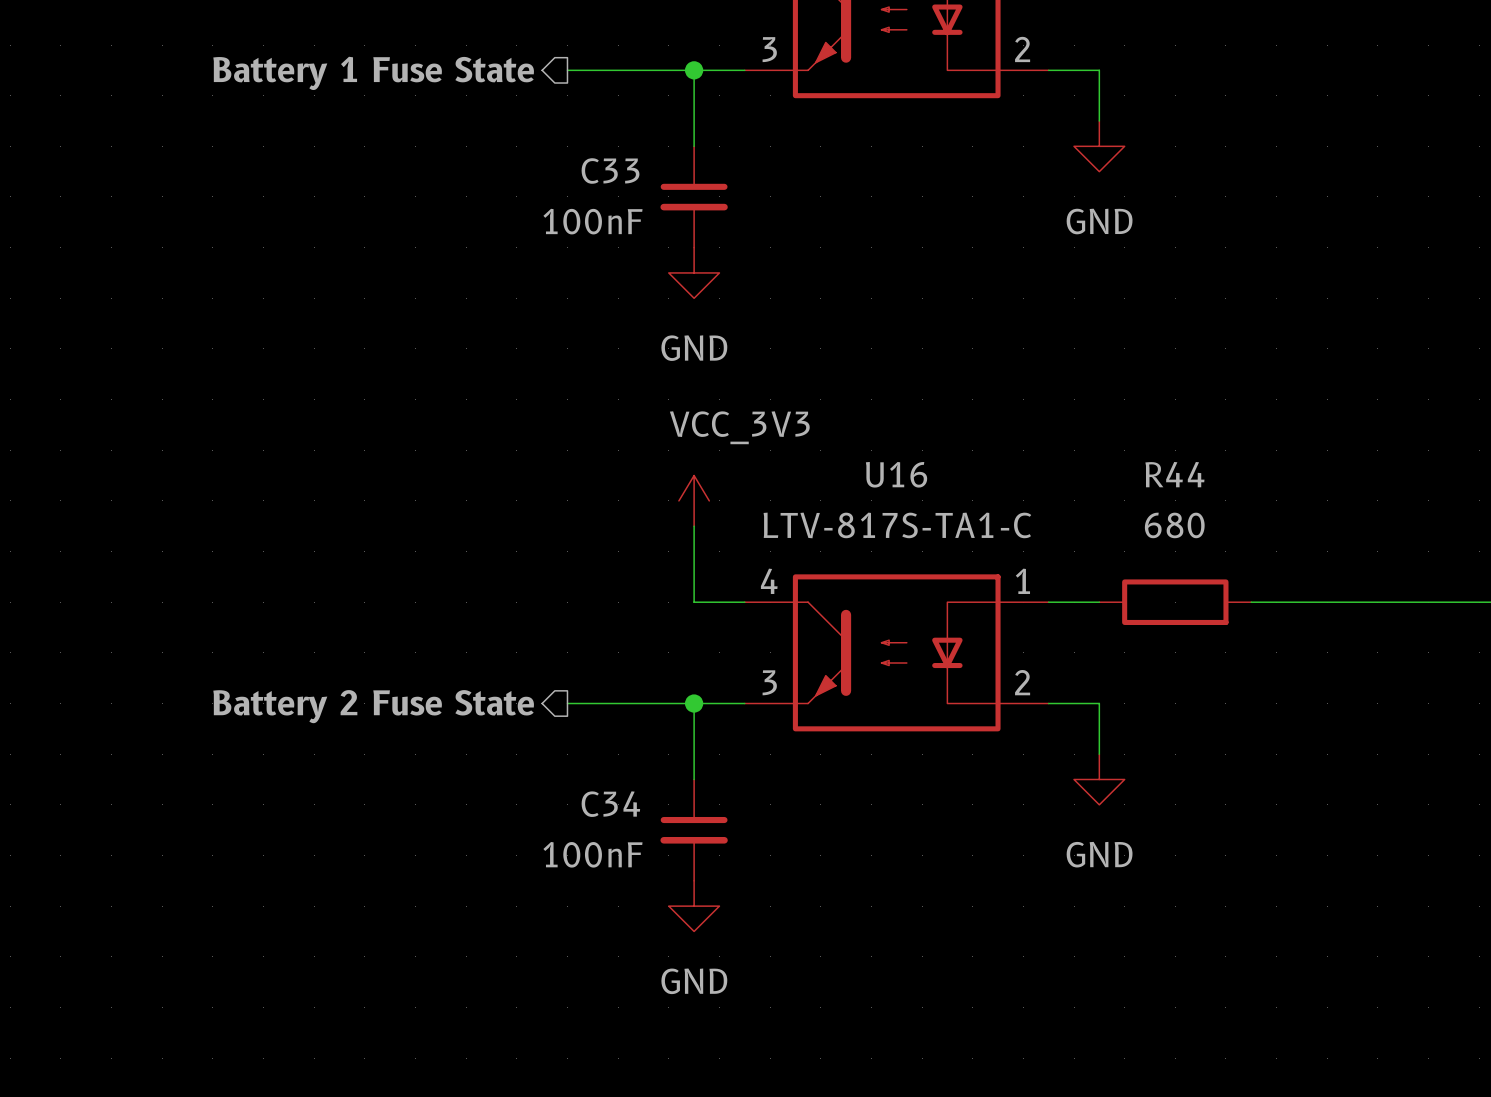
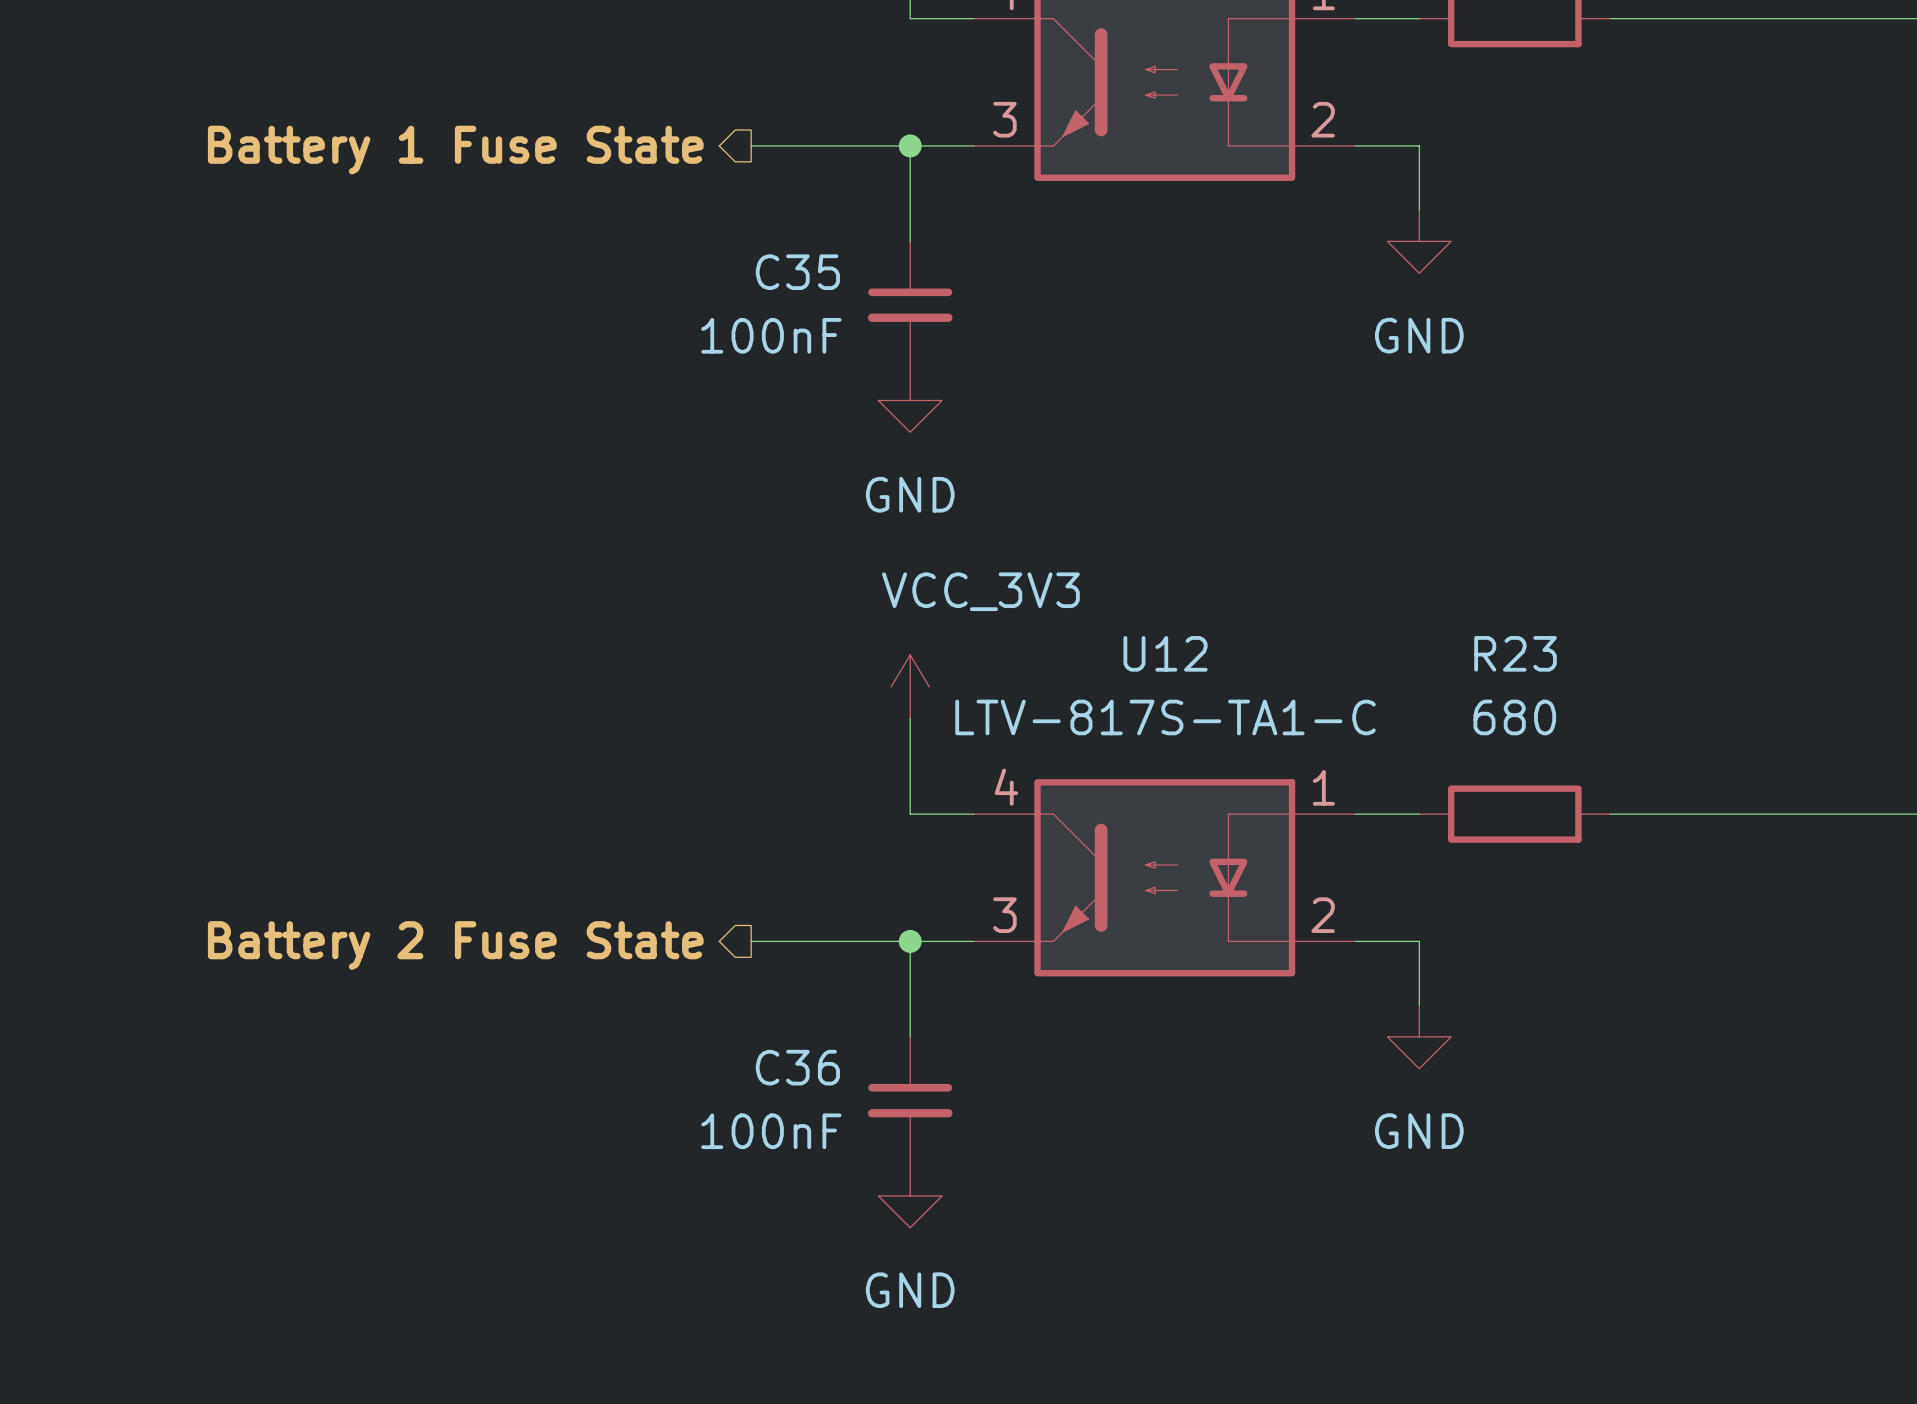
C33 name: C33 (610, 170) -> C35 (797, 272)
U16 name: U16 (896, 474) -> U12 (1165, 653)
R44 name: R44 (1174, 474) -> R23 (1515, 653)
C34 name: C34 (610, 804) -> C36 (797, 1067)

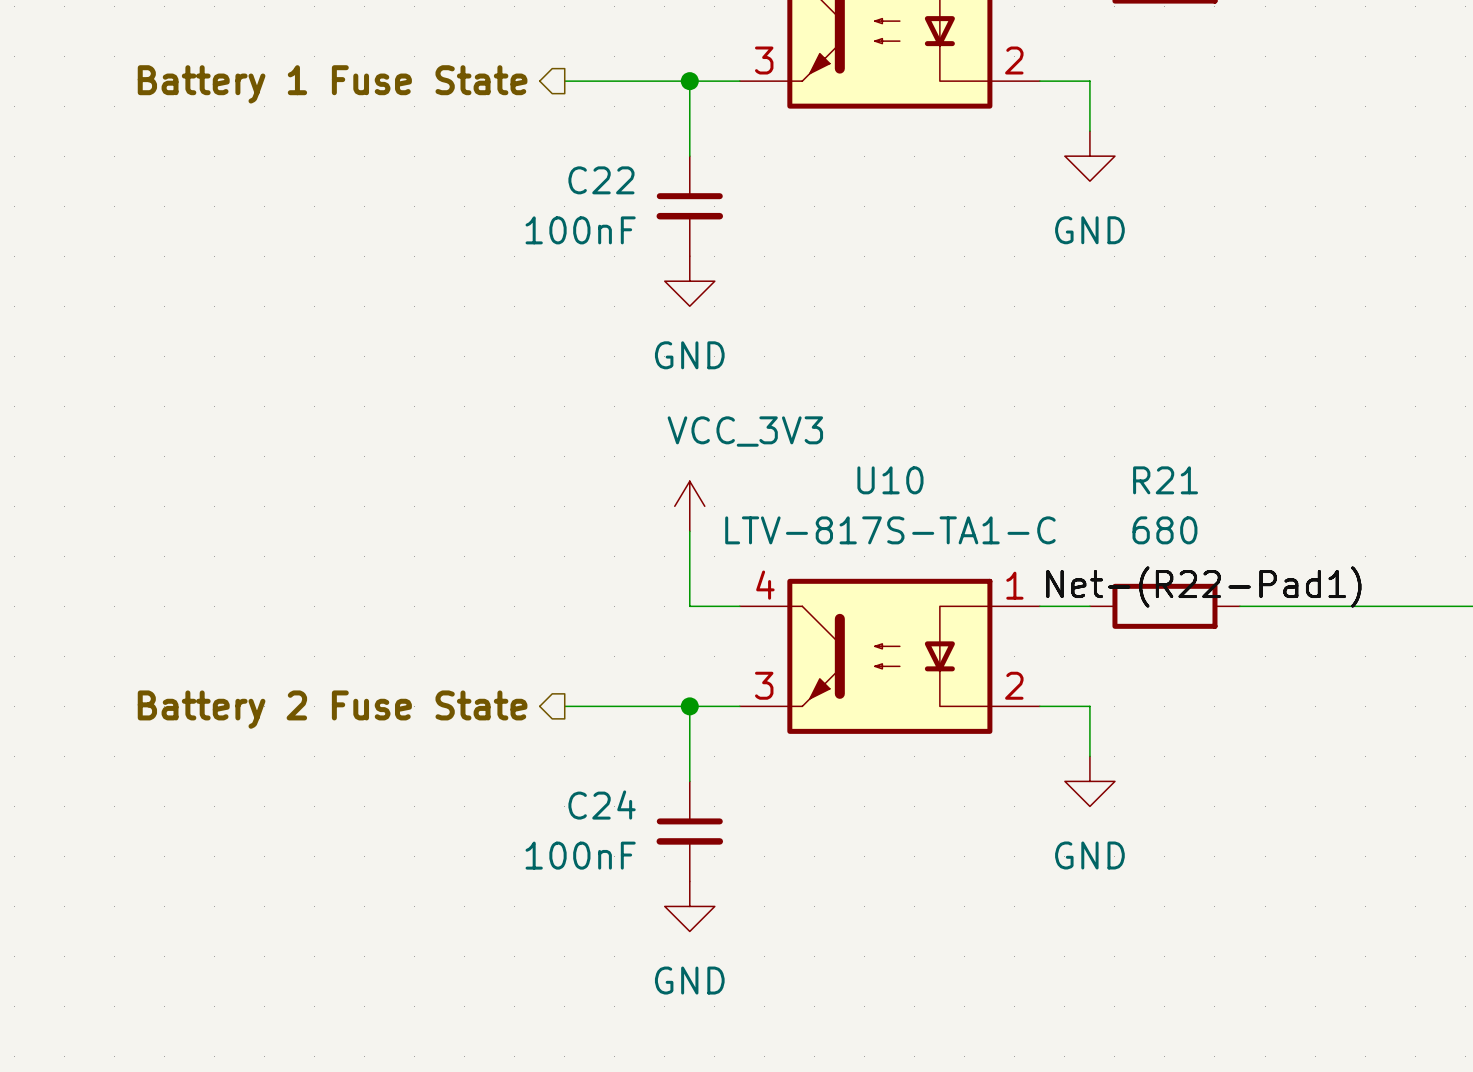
C35 name: C35 (797, 272) -> C22 (601, 180)
U12 name: U12 (1165, 653) -> U10 (890, 480)
R23 name: R23 (1515, 653) -> R21 (1165, 480)
label: none -> Net-(R22-Pad1) (1203, 586)
C36 name: C36 (797, 1067) -> C24 (602, 805)

